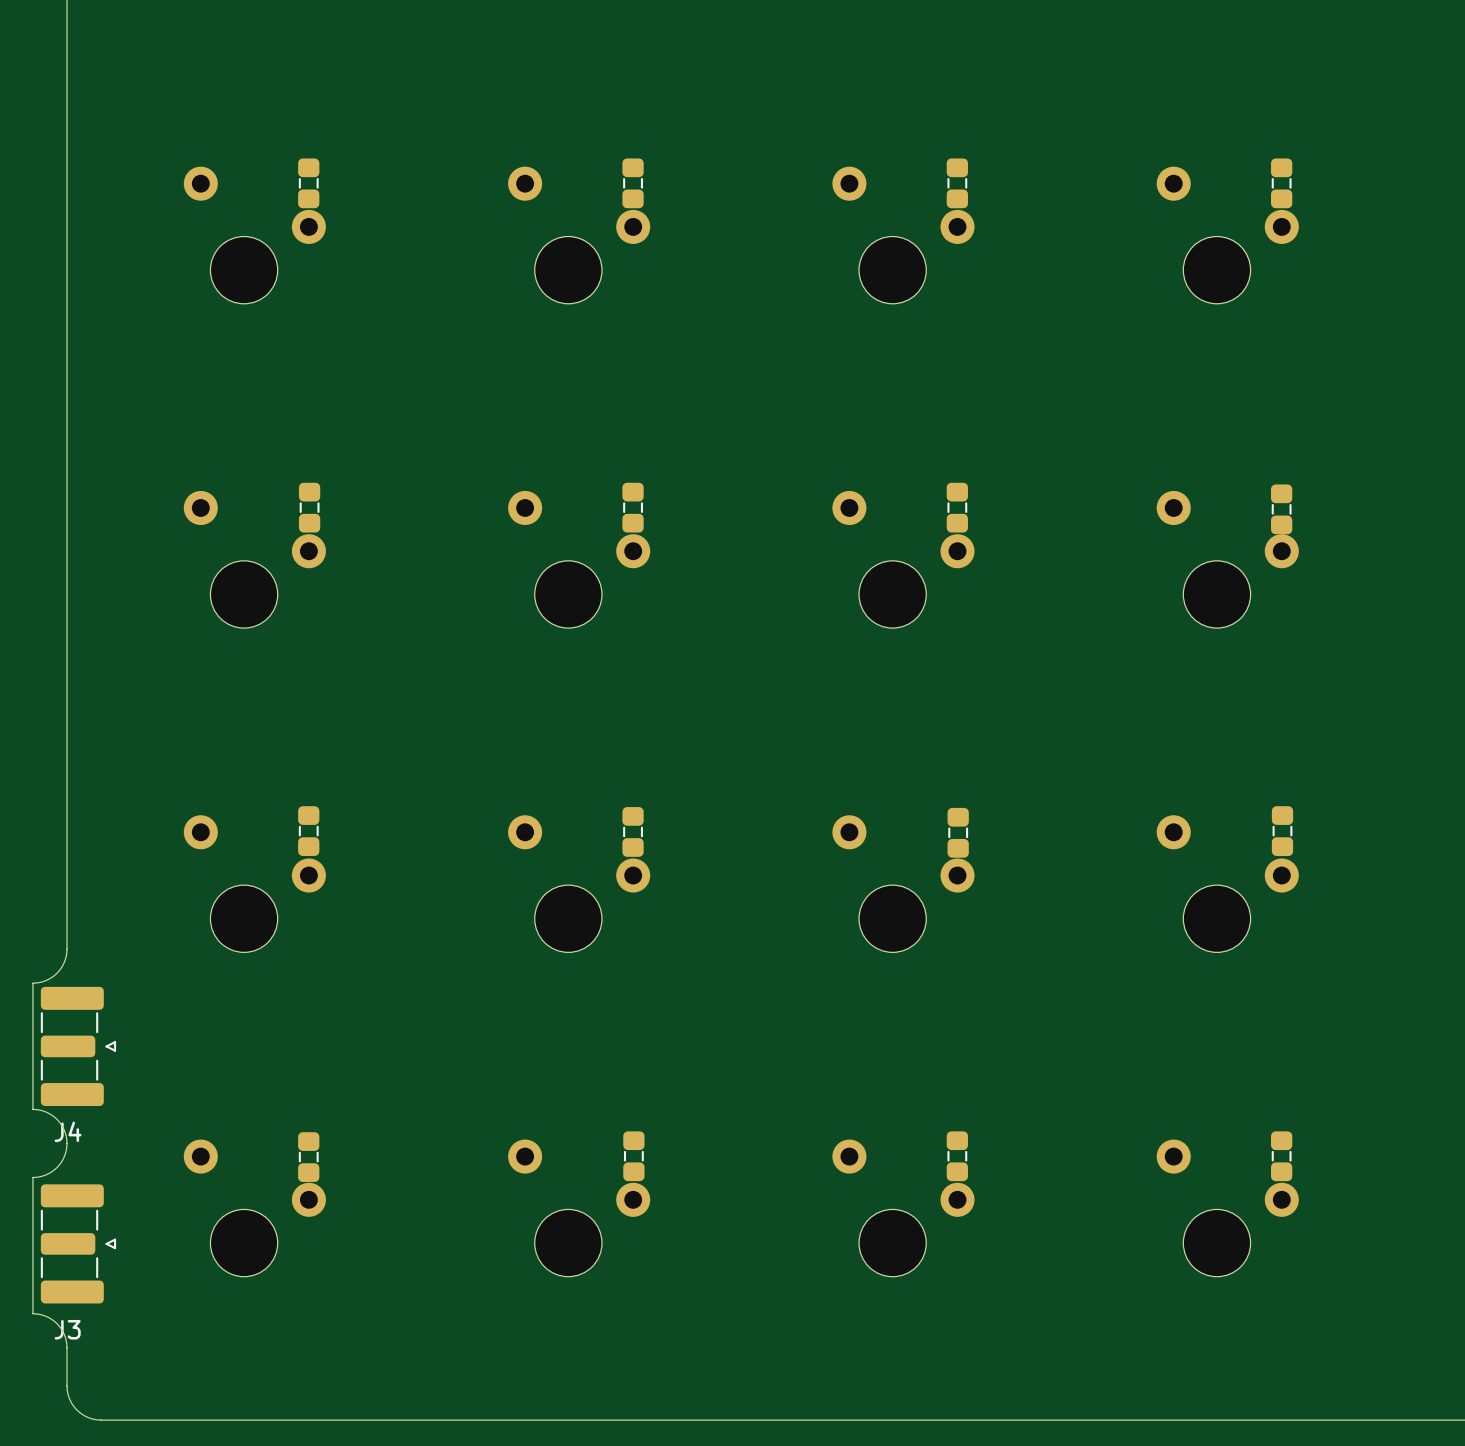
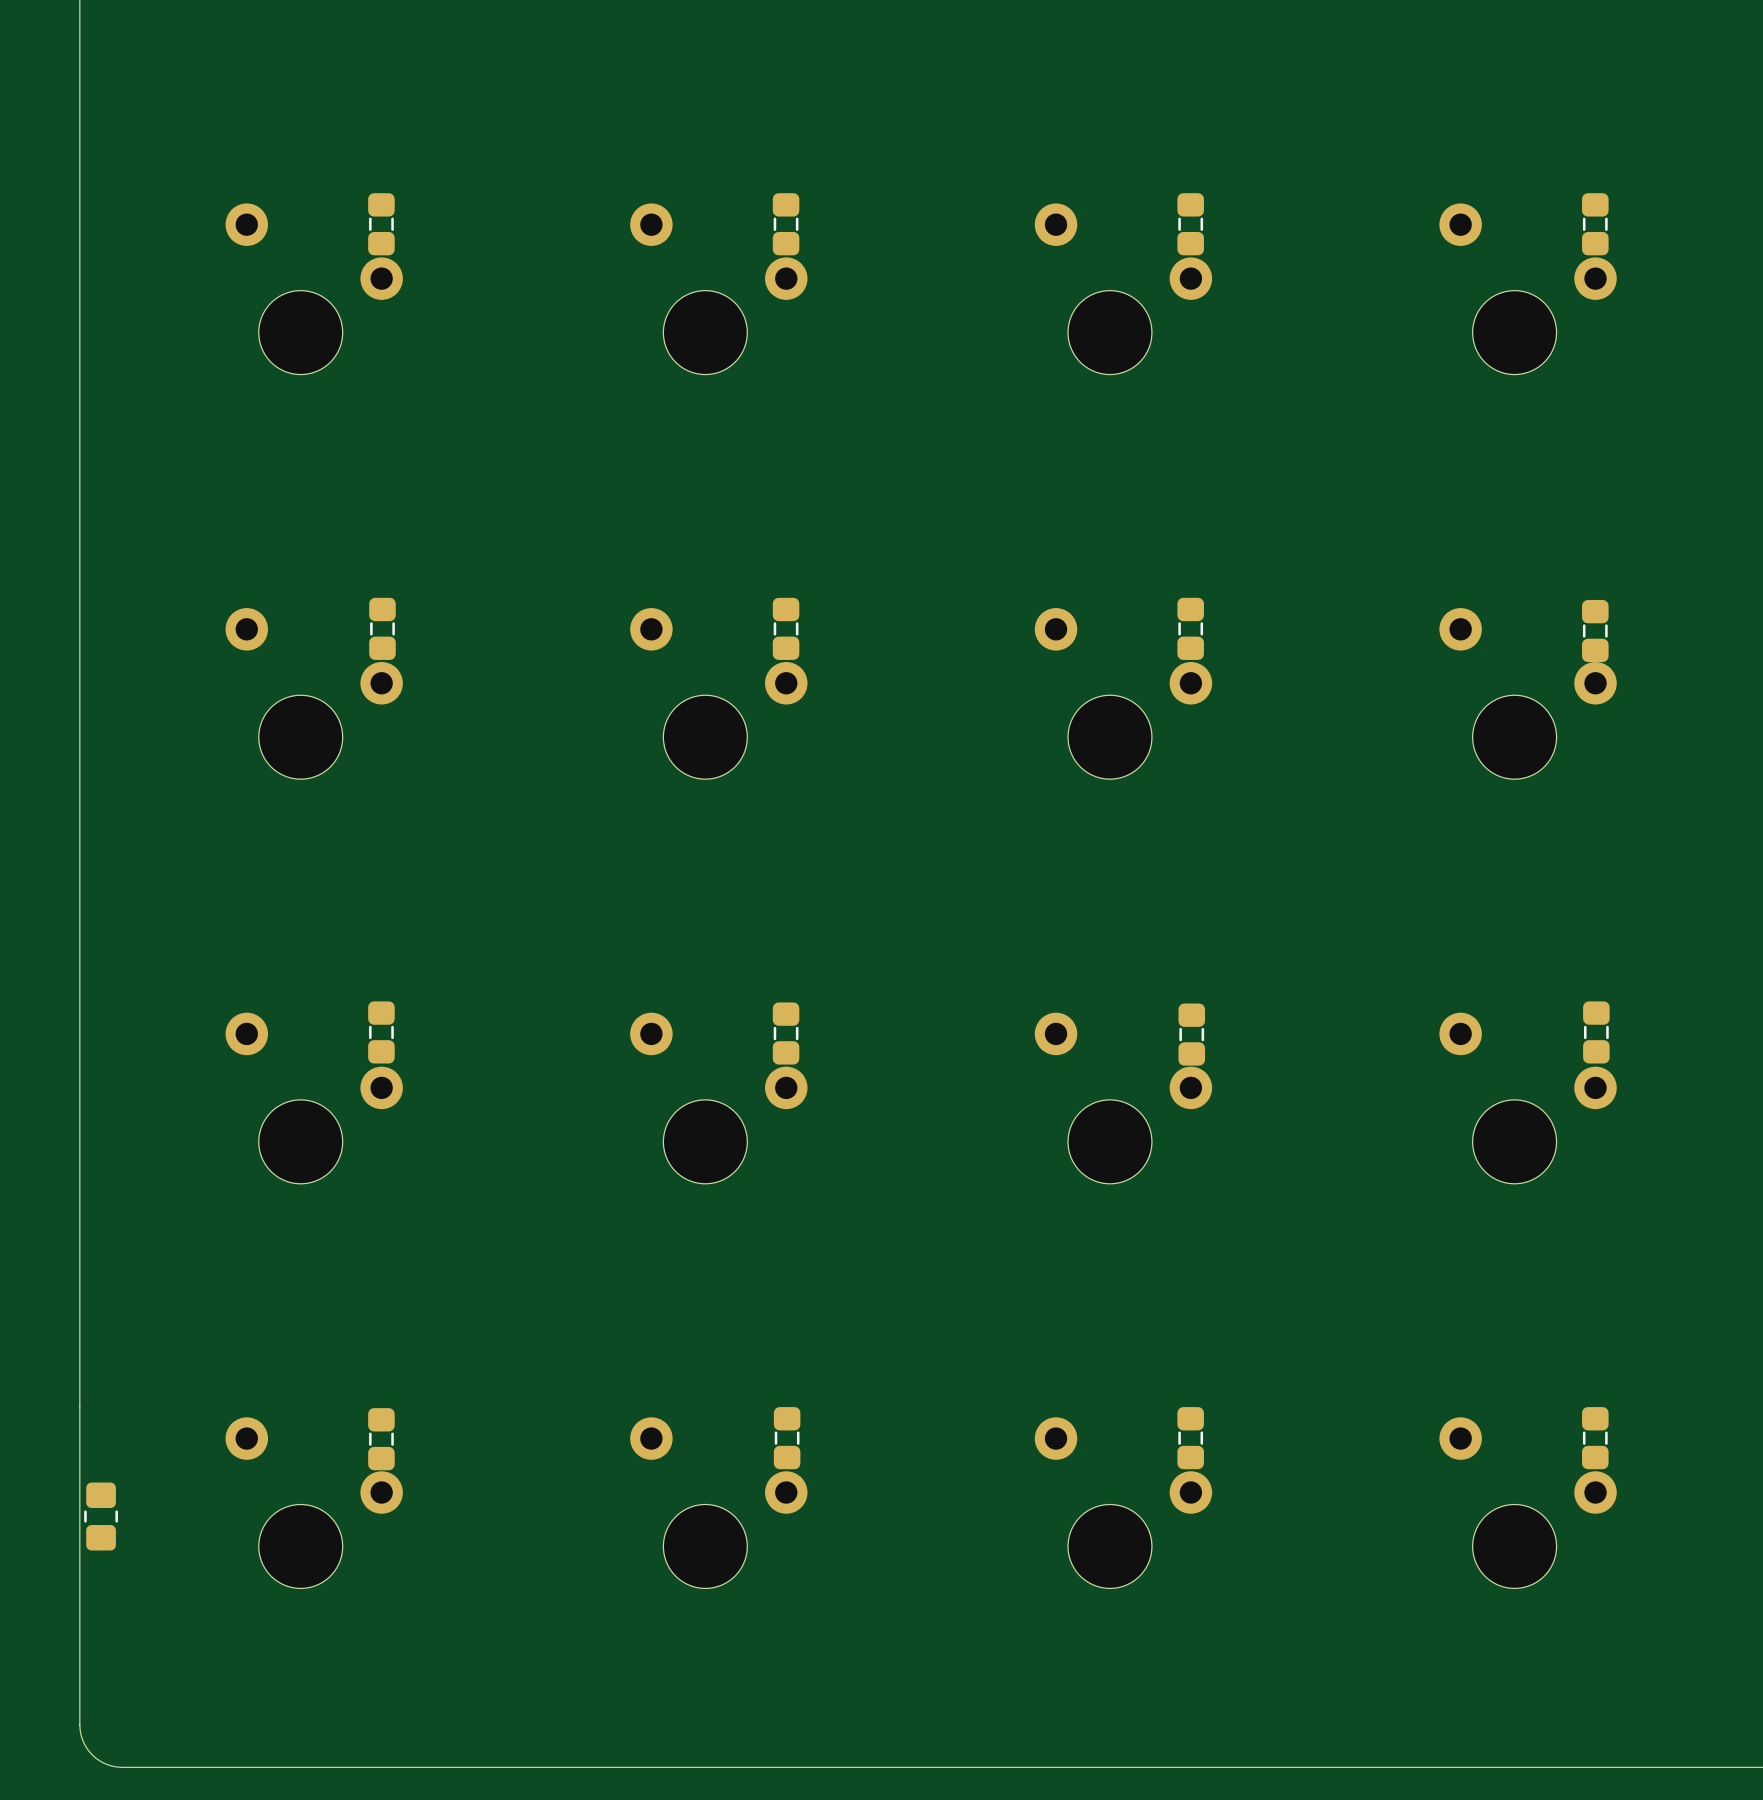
board edge: (67, 949) (64, 962) (57, 973) (45, 980) (32, 983) (32, 1109) (45, 1112) (57, 1119) (64, 1130) (67, 1143) (64, 1156) (57, 1167) (45, 1174) (32, 1177) (32, 1313) (45, 1316) (57, 1323) (64, 1334) (67, 1347) -> (79, 1179) (79, 1677)
J4: (78, 1046) -> none
part: none -> (101, 1516)
J3: (78, 1243) -> none

